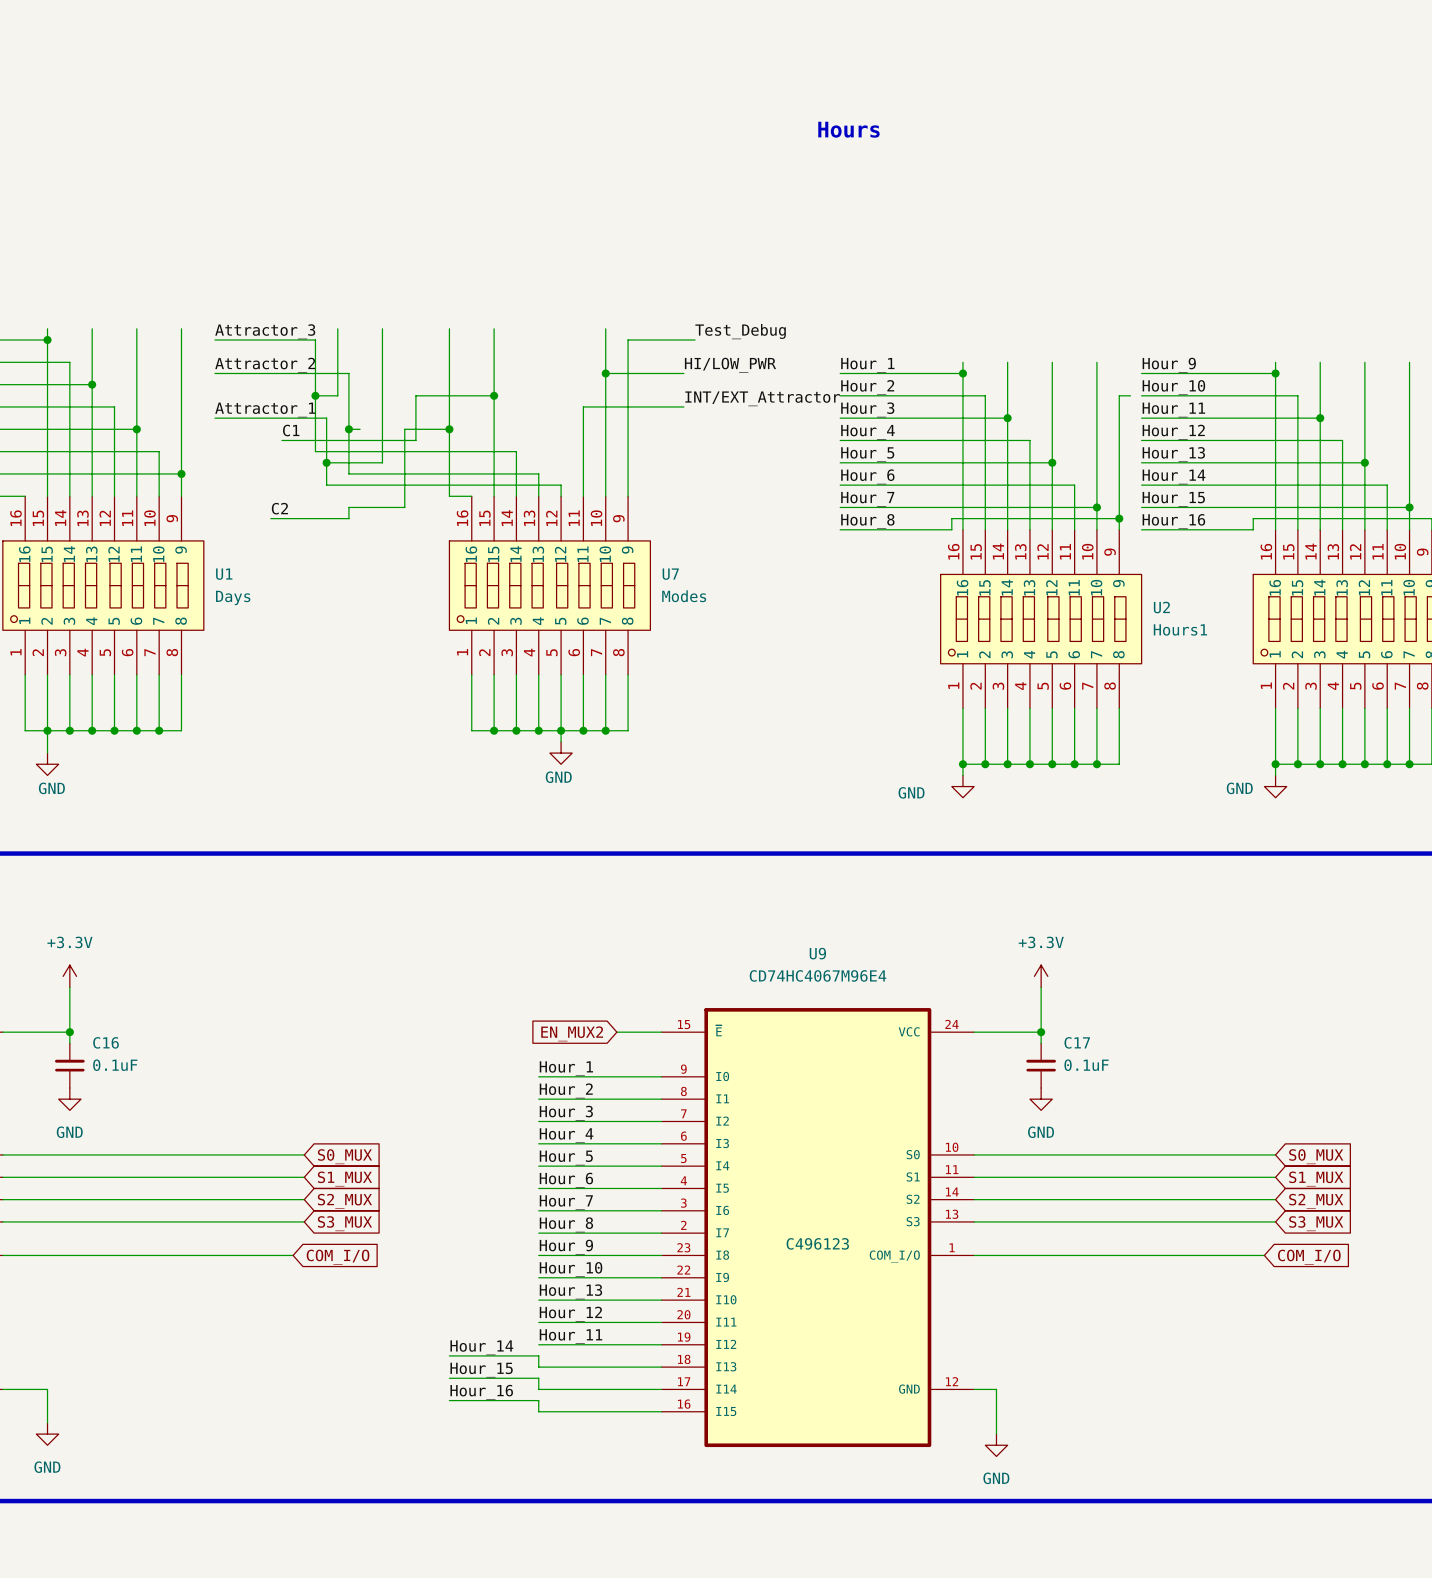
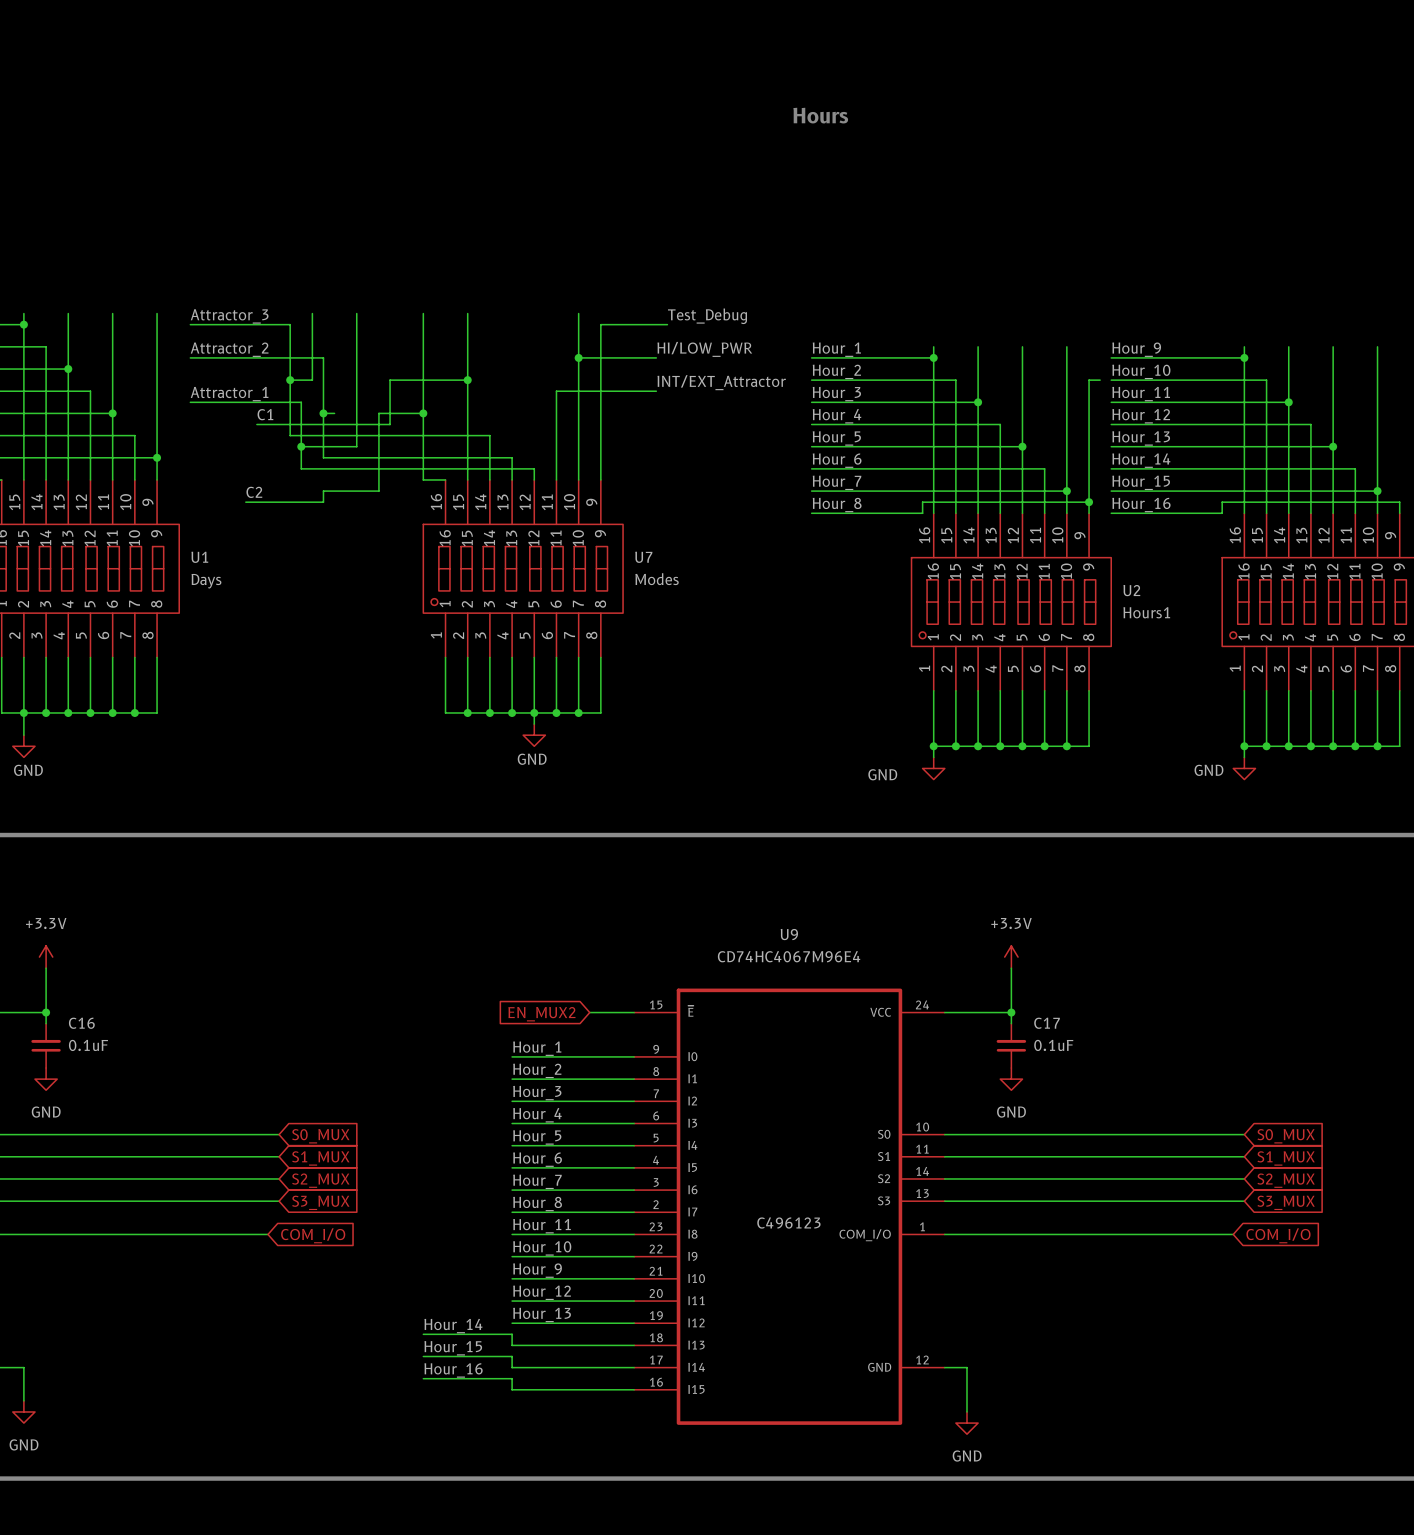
label: Hour_9 (566, 1247) -> Hour_11 (542, 1226)
label: Hour_13 (570, 1291) -> Hour_9 (537, 1270)
label: Hour_11 (571, 1336) -> Hour_13 (542, 1314)

